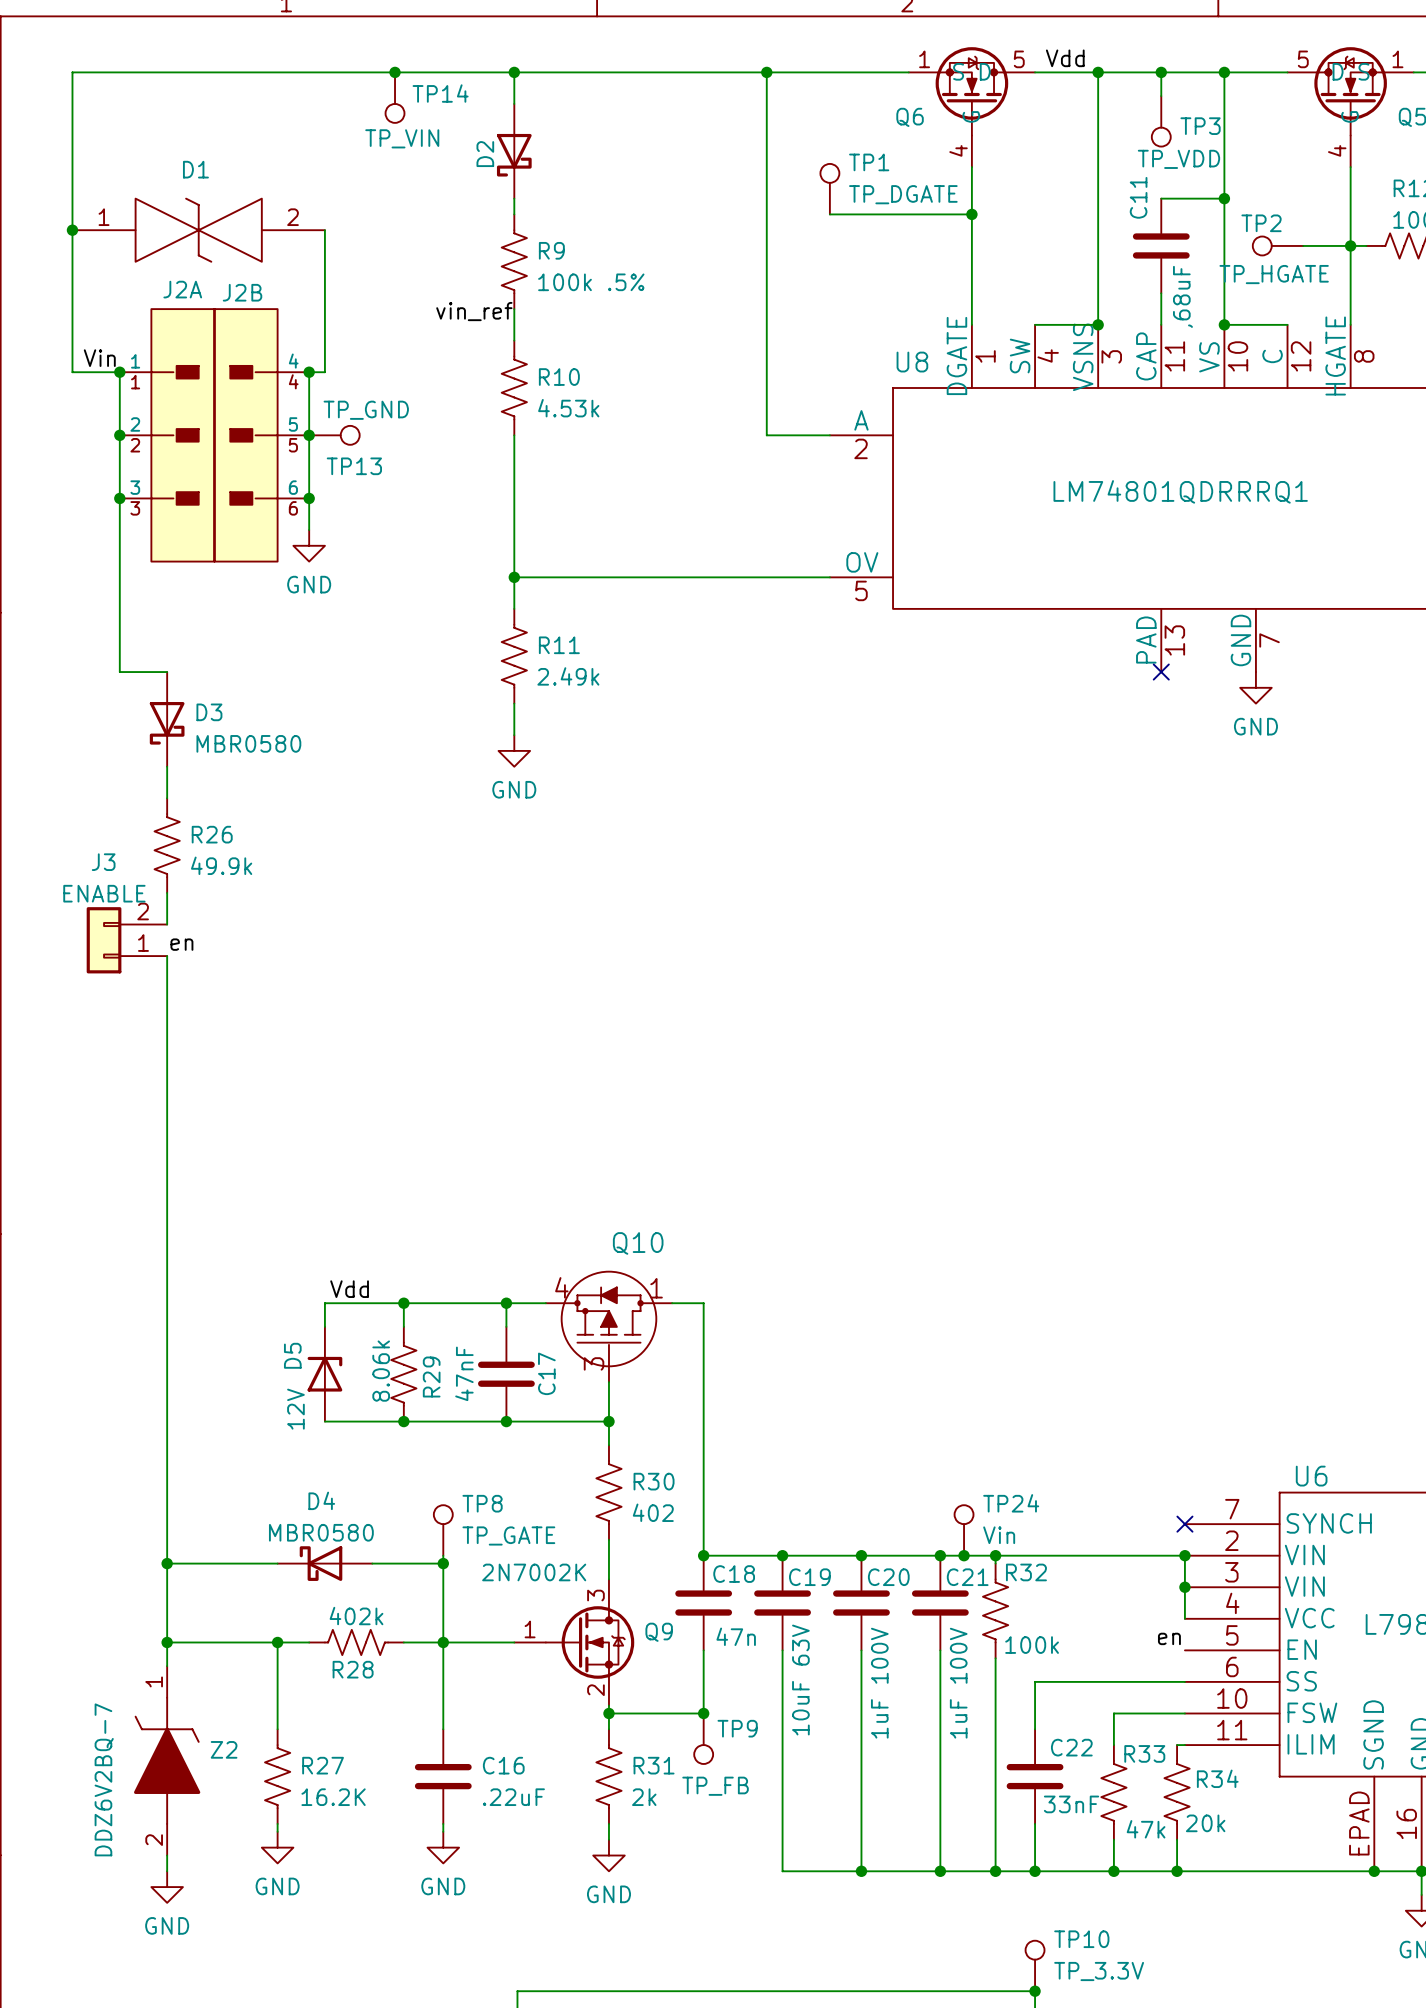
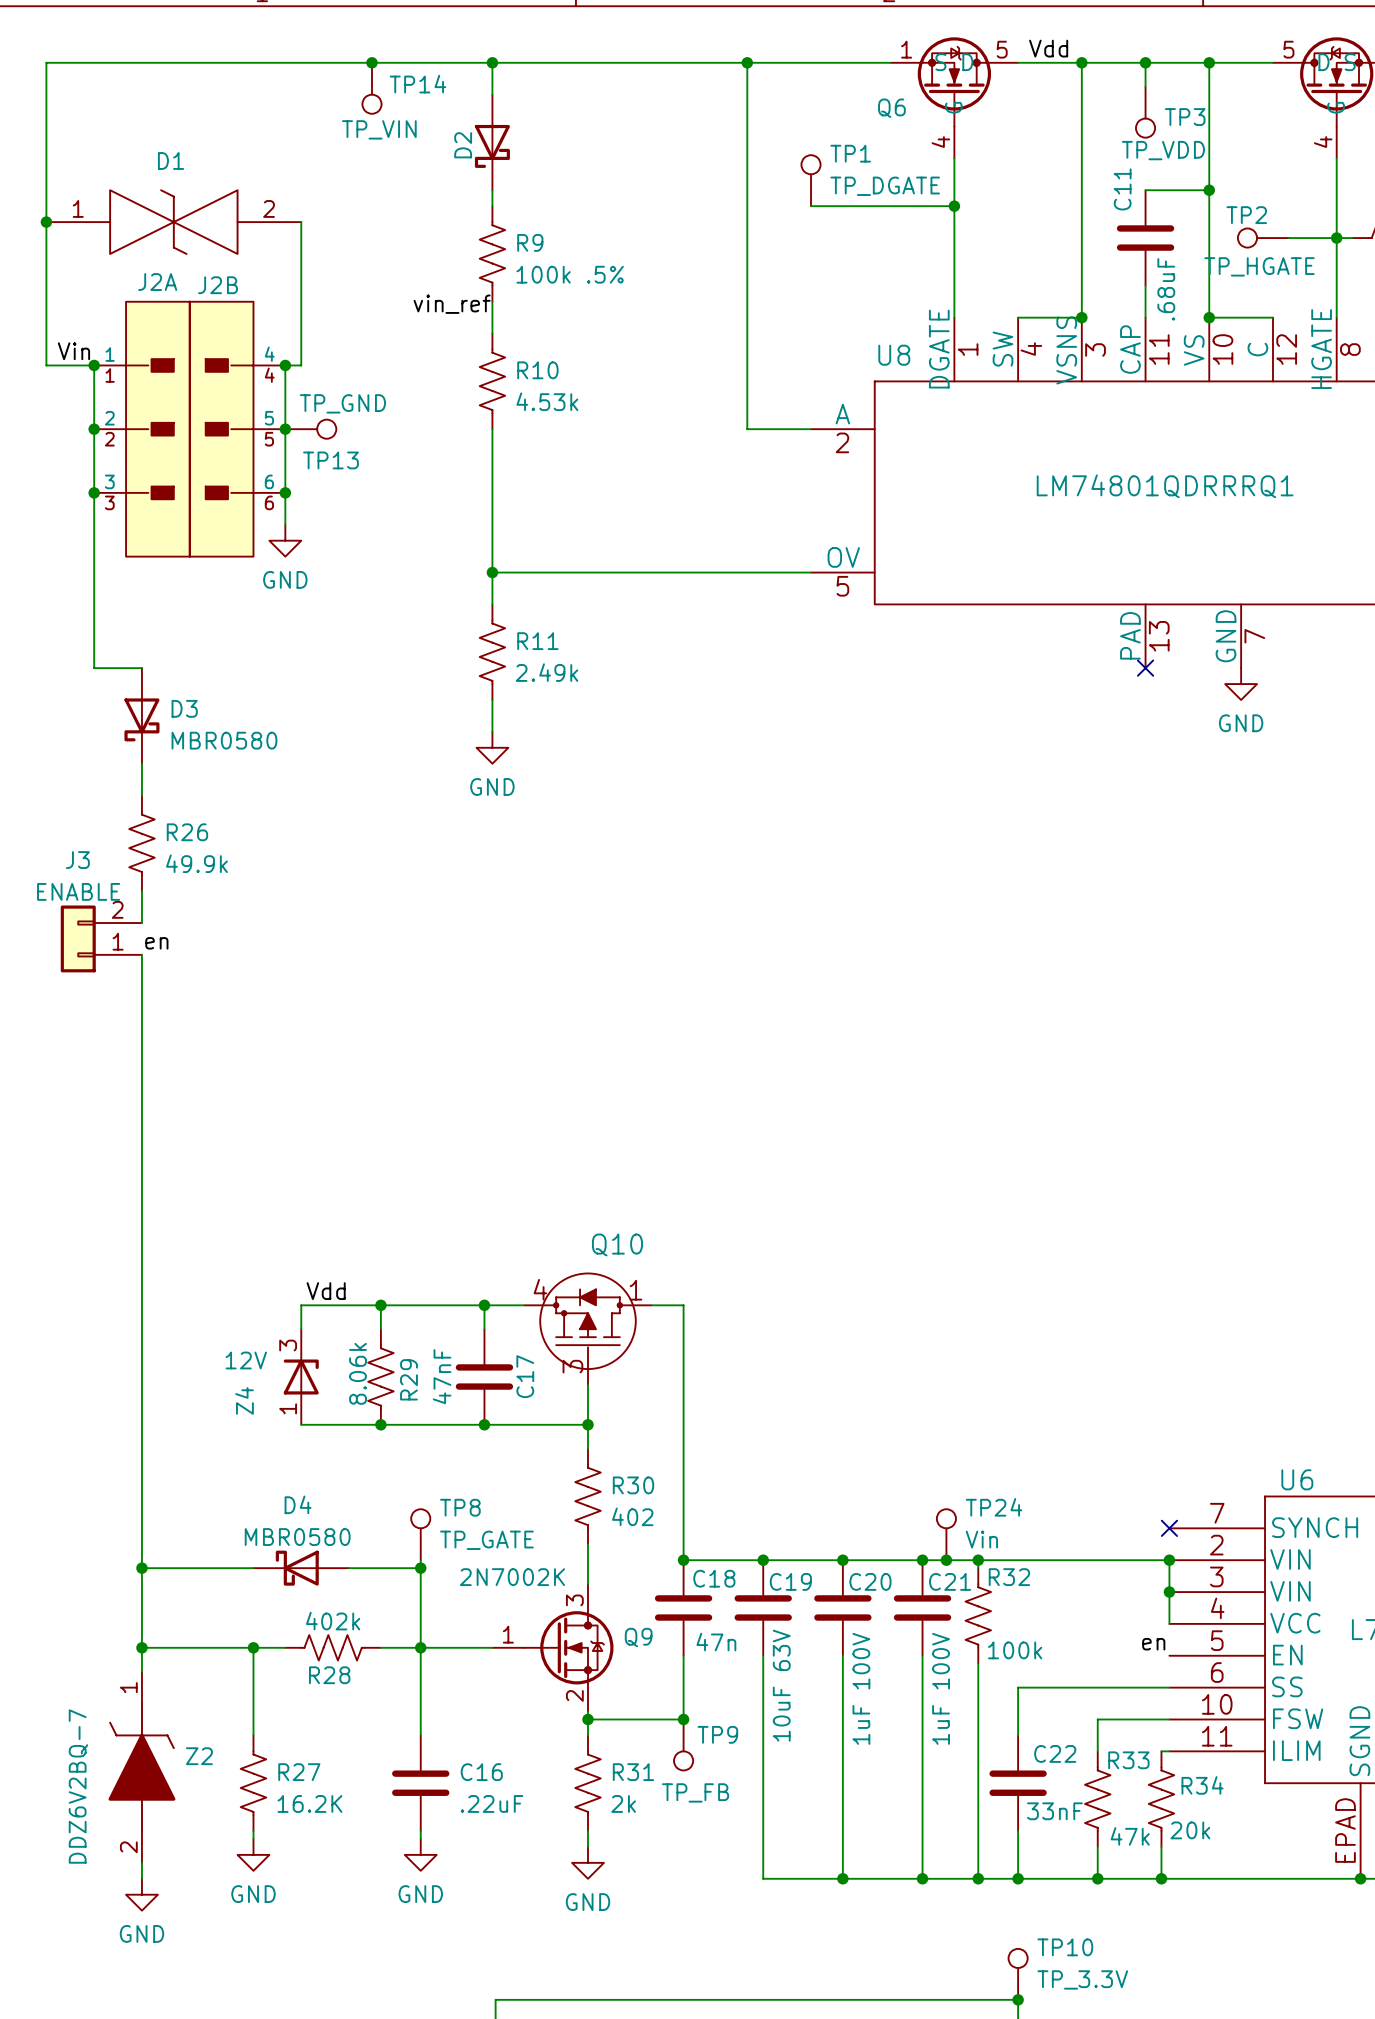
C11 value: ,68uF (1182, 296) -> .68uF (1166, 289)
D5 pin number: none -> 3 (288, 1345)
D5 name: D5 (292, 1355) -> Z4 (244, 1400)
D5 pin number: none -> 1 (288, 1408)
D5 value rotation: 0° (295, 1409) -> 90° clockwise (246, 1360)
D5 value position: 12V (295, 1409) -> 12V (246, 1360)

